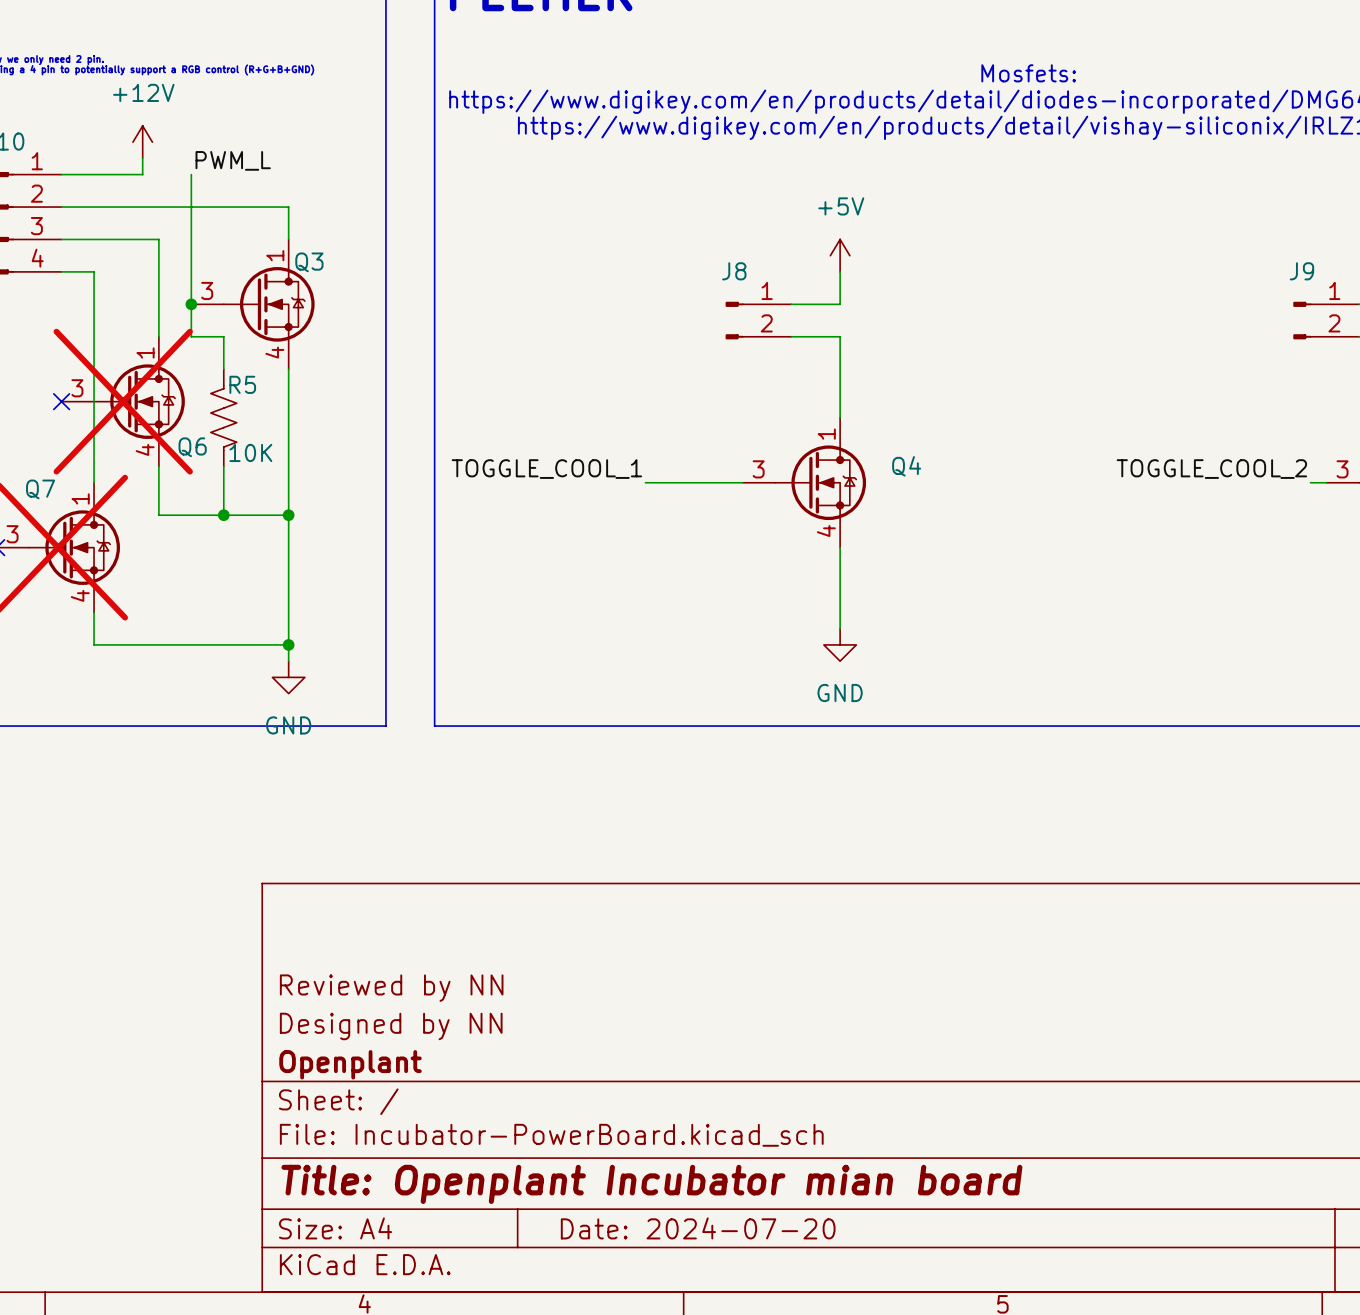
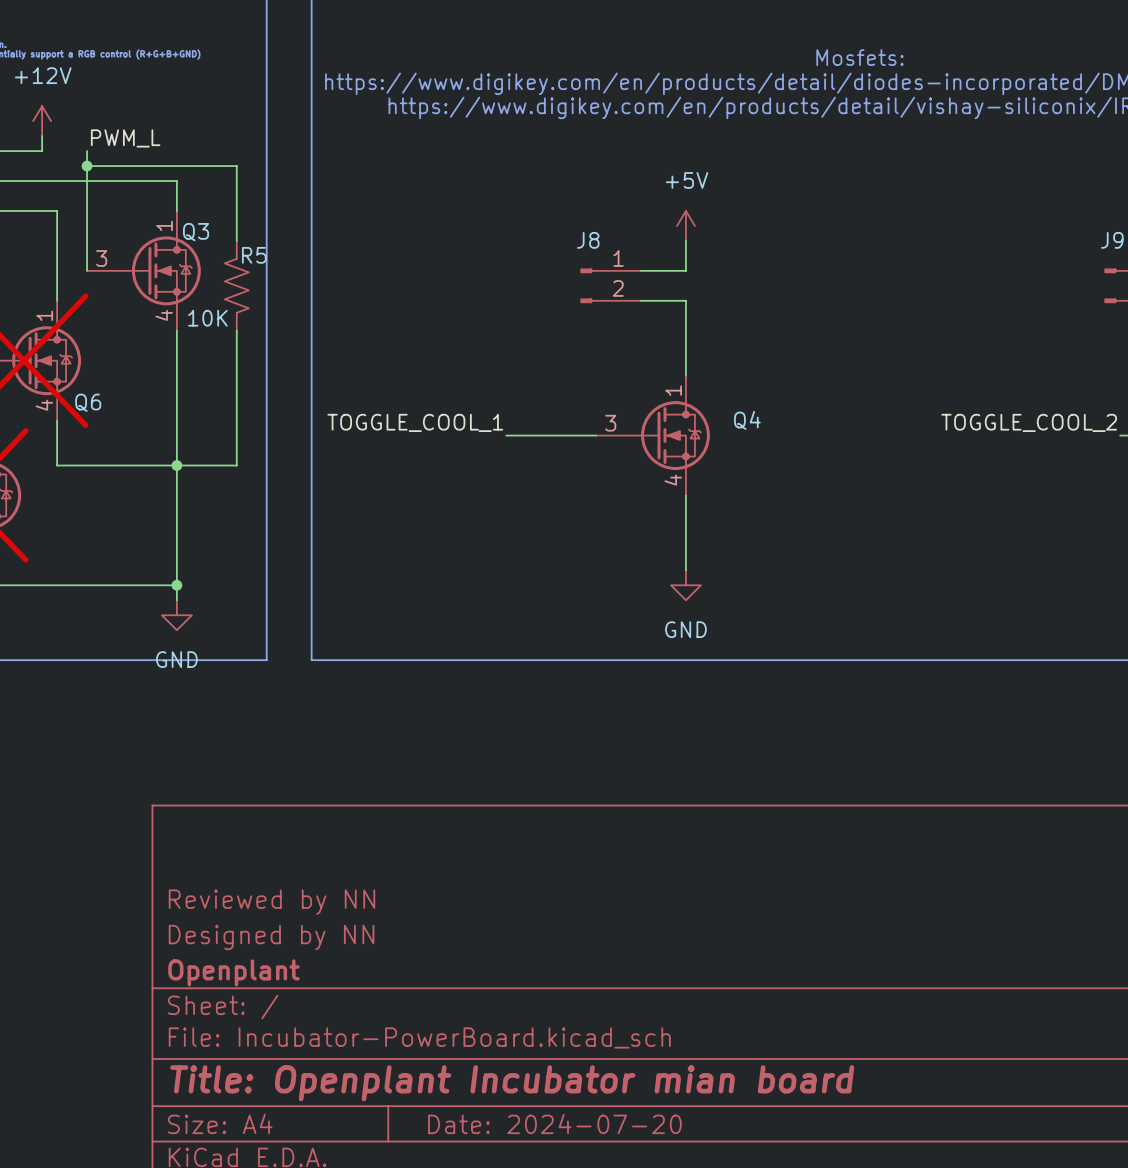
wire: none -> (87, 166) (236, 166) (236, 240)
junction: none -> (87, 166)
wire: (191, 304) (191, 336) (223, 336) (223, 369) -> none
junction: (191, 304) -> none
wire: none -> (236, 330) (236, 465) (176, 465)
R5 position: (223, 417) -> (236, 285)
R5 value position: 10K (250, 452) -> 10K (207, 318)
wire: (223, 466) (223, 515) -> none
junction: (223, 515) -> none

